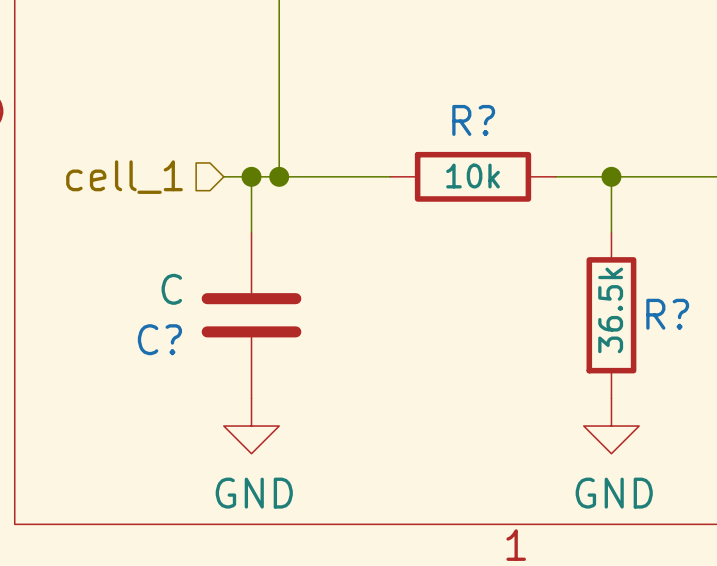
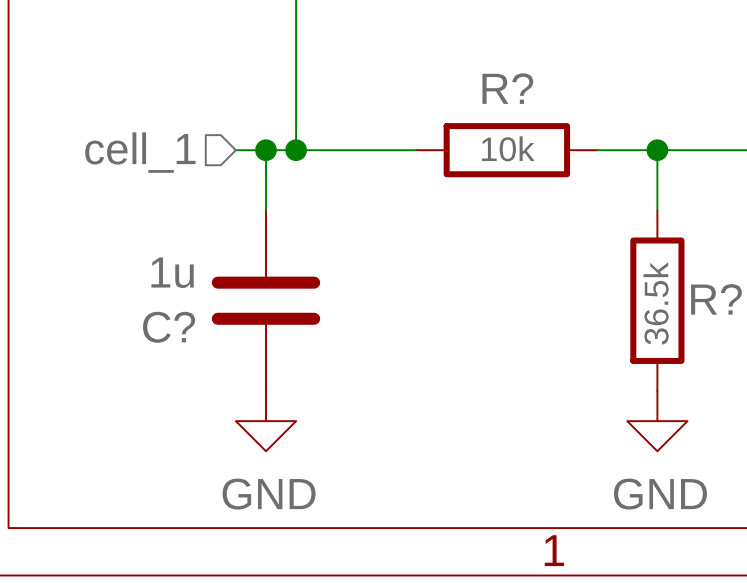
C? value: C (171, 289) -> 1u (172, 272)

